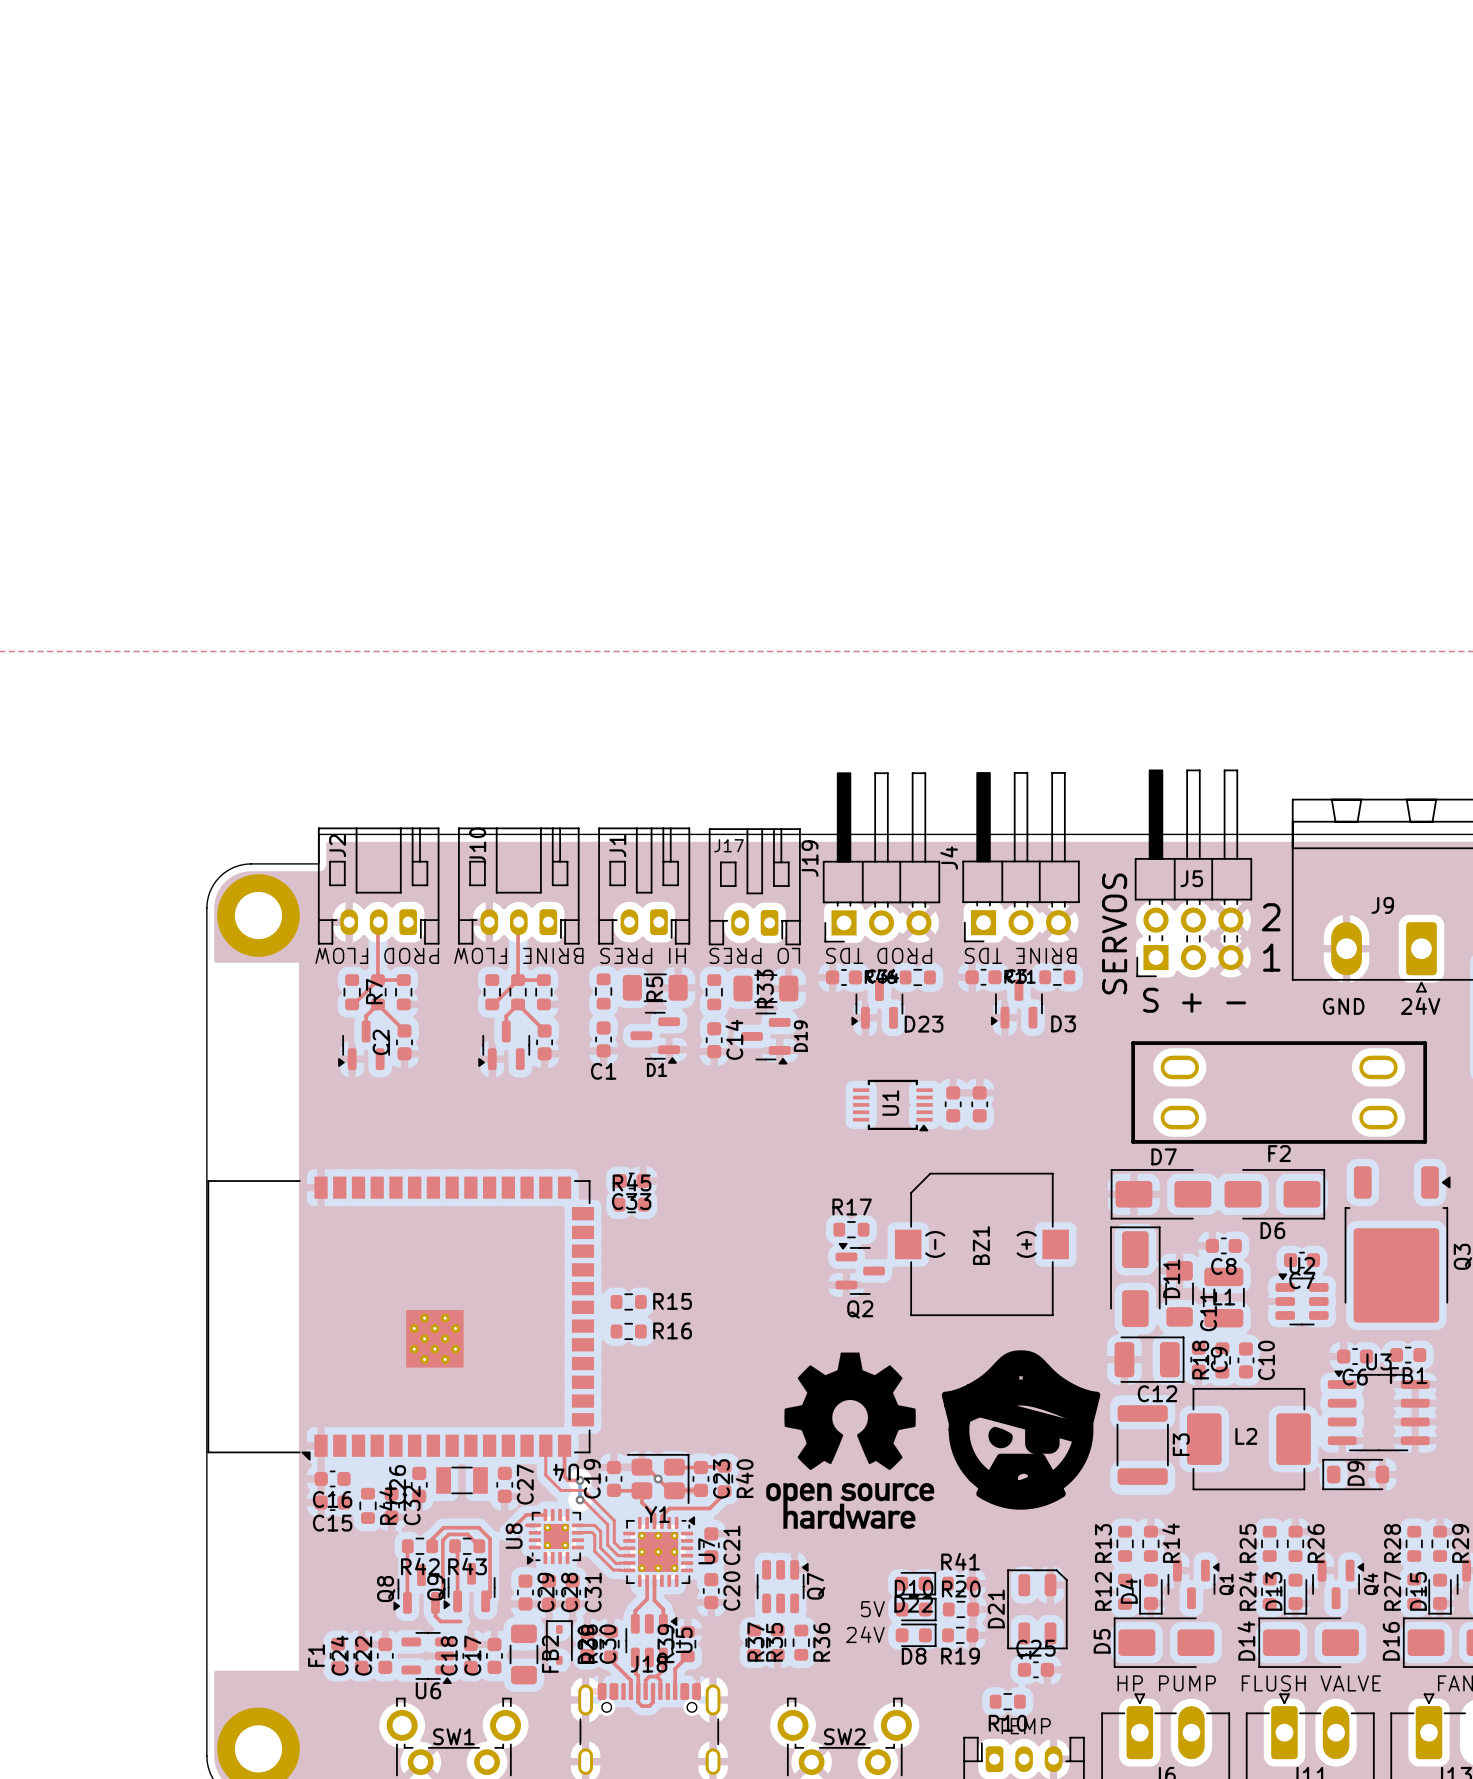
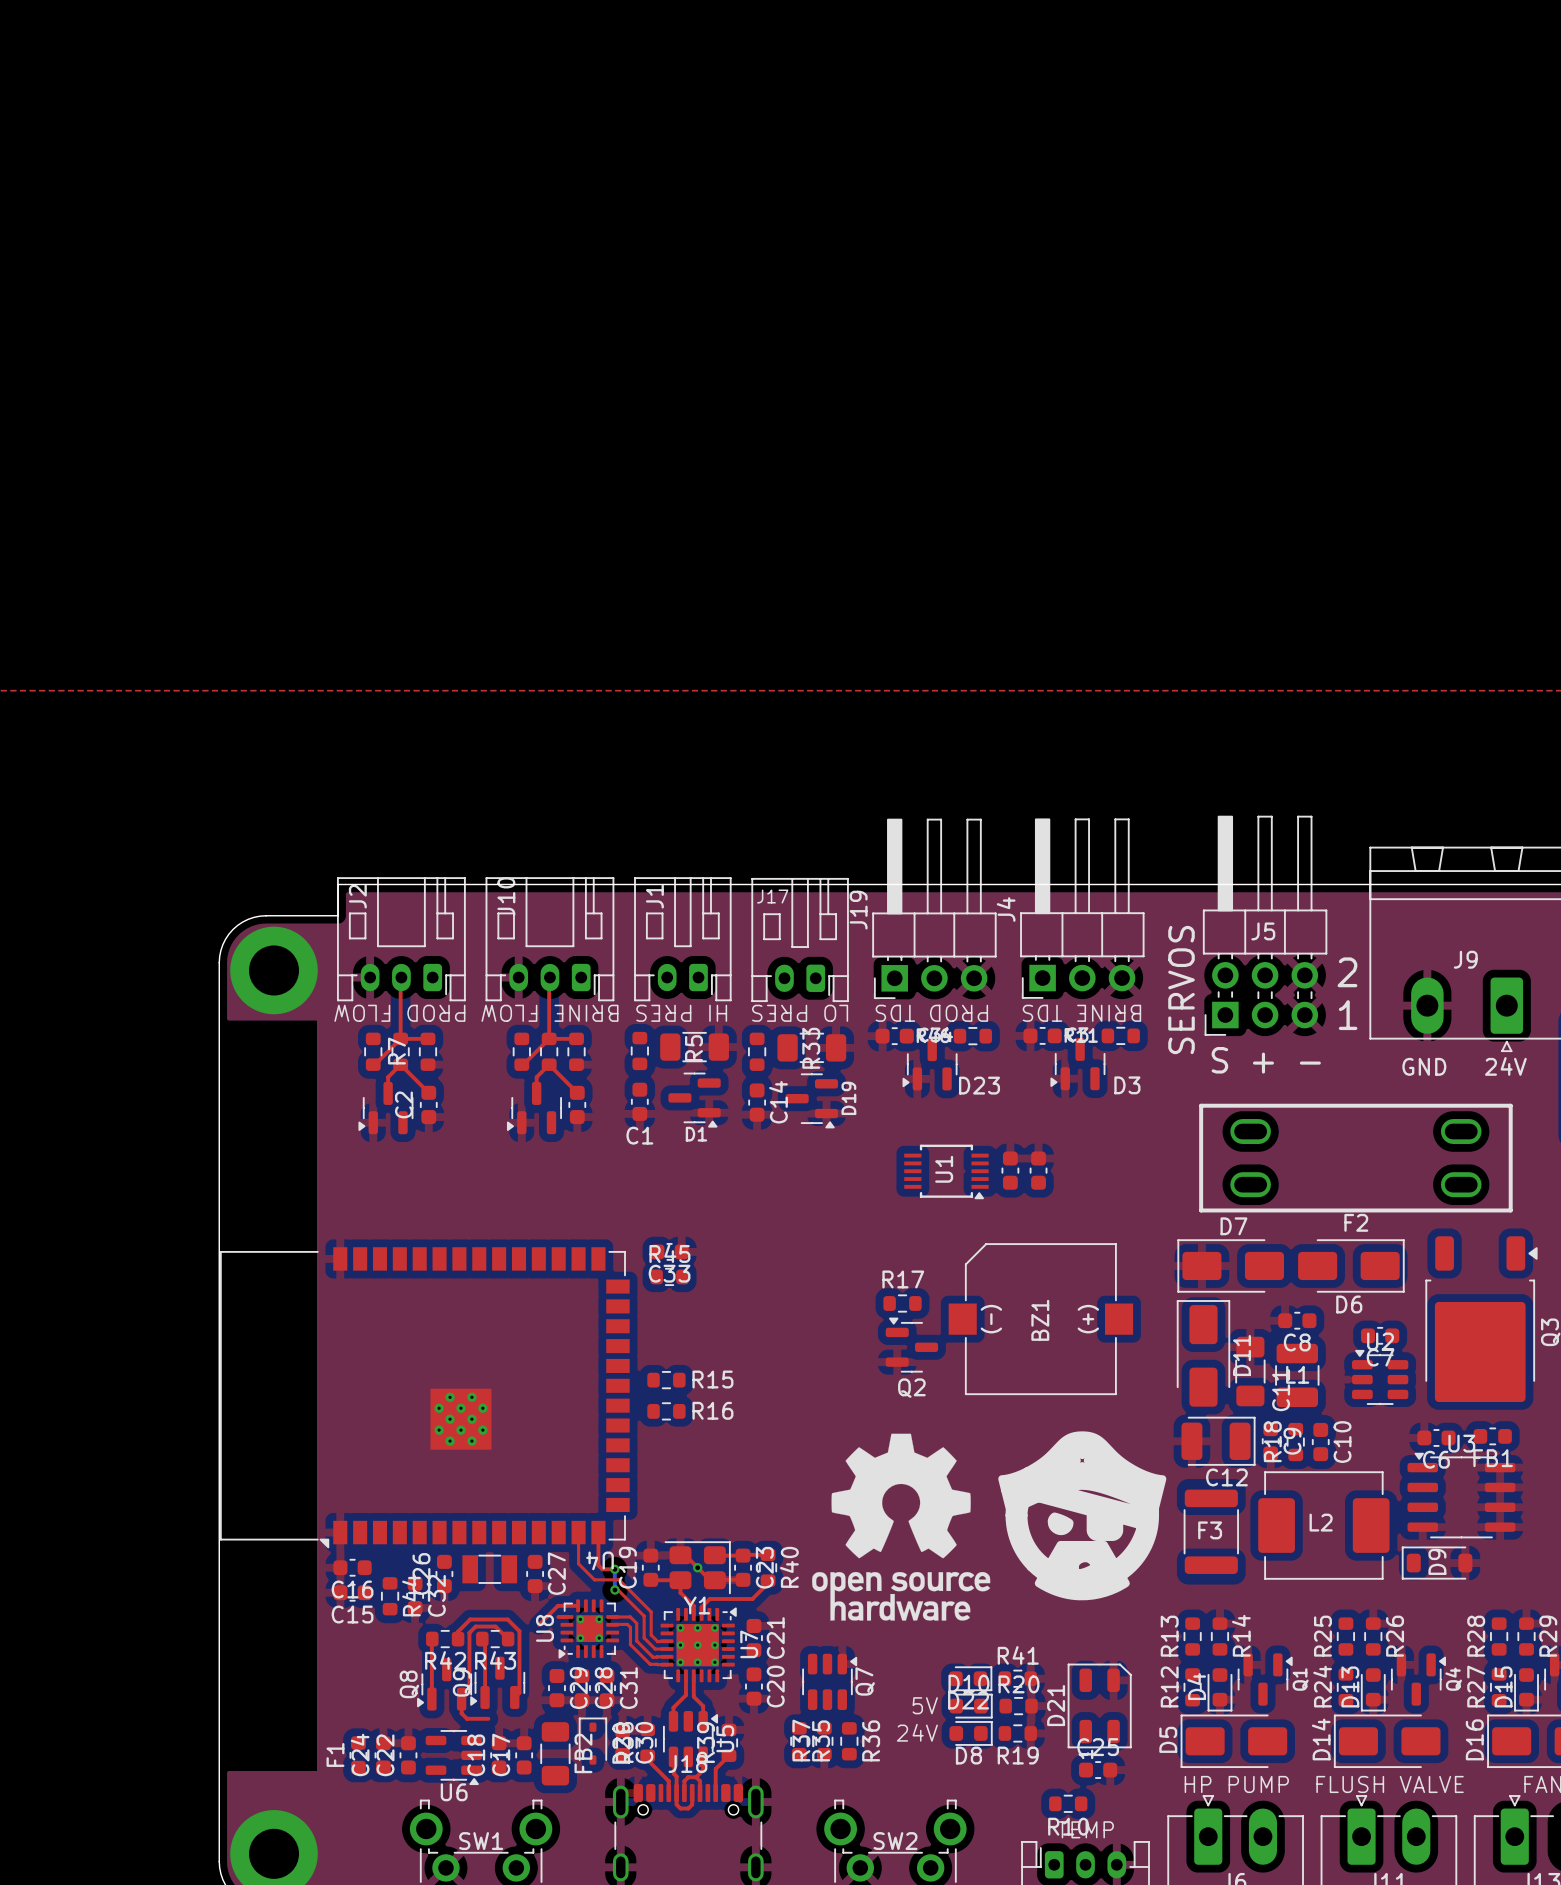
F3 name rotation: 0° (1181, 1444) -> 90° clockwise (1210, 1530)
F3 name position: F3 (1181, 1444) -> F3 (1210, 1530)

